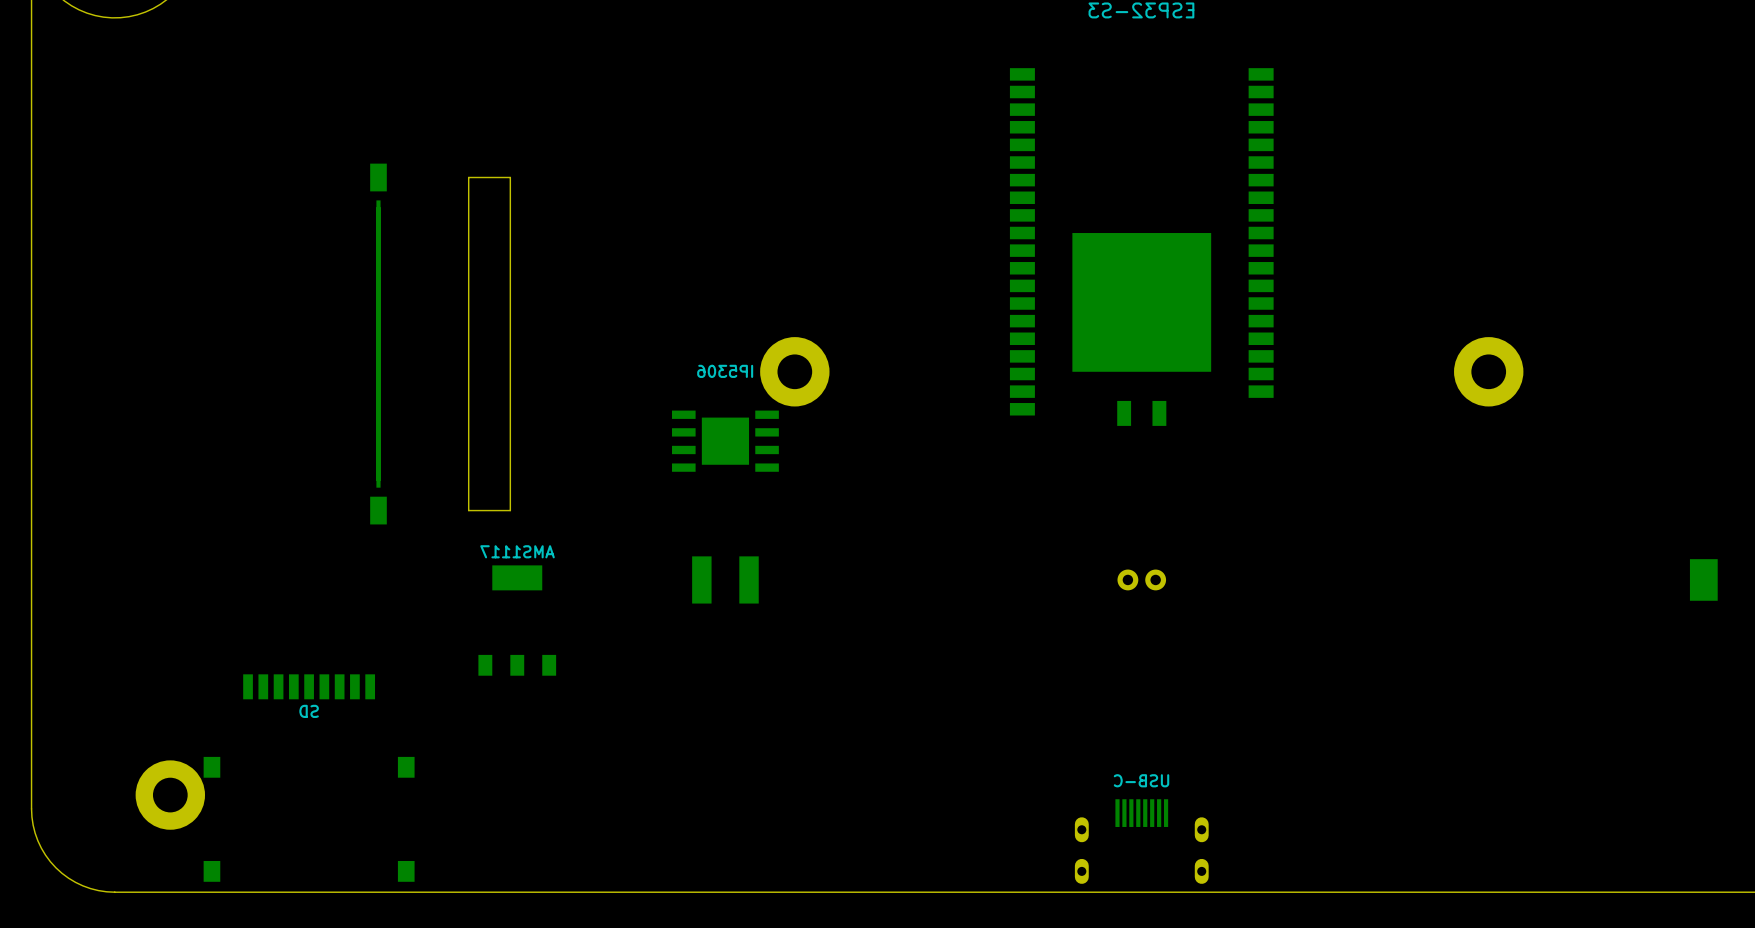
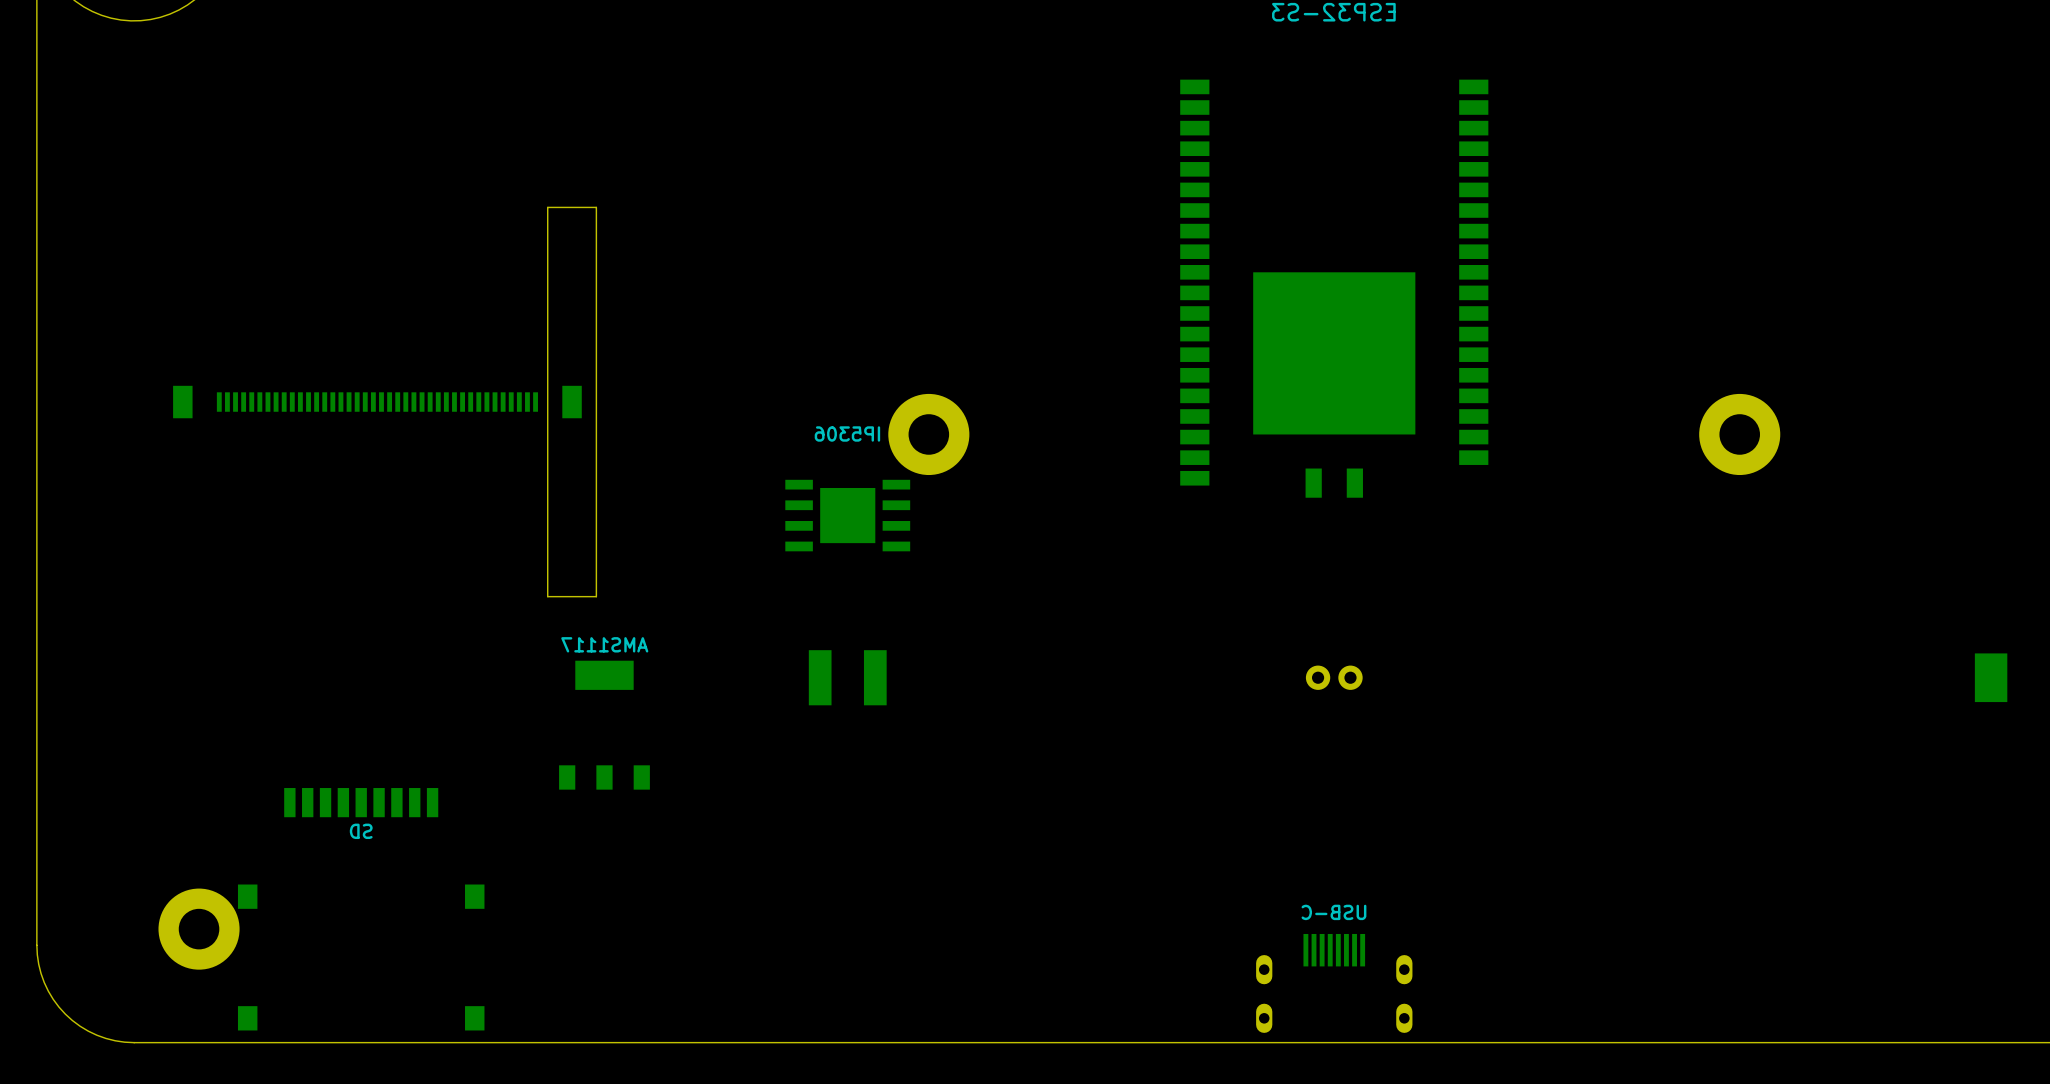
part: none -> (377, 402)
part: (378, 344) -> none

